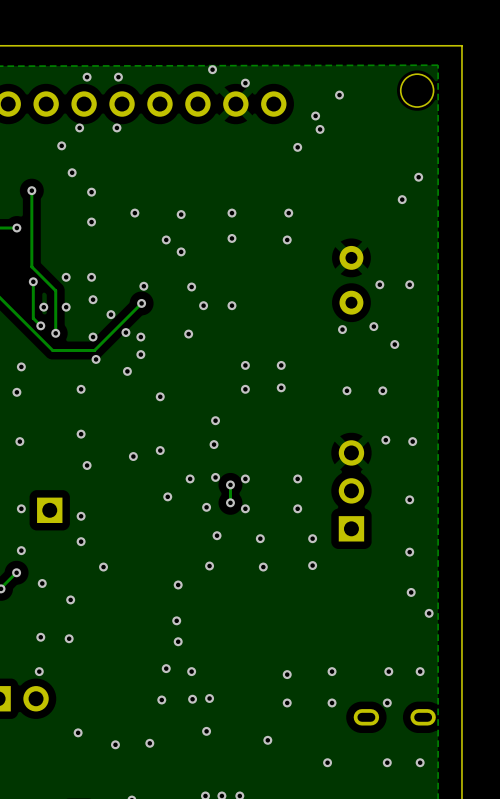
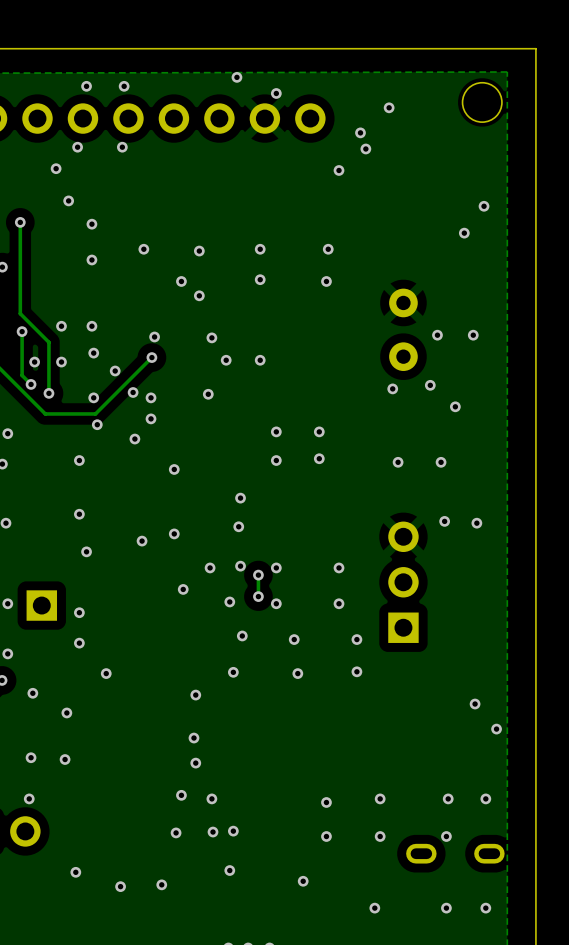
via: (409, 499) -> none
via: (409, 552) -> none

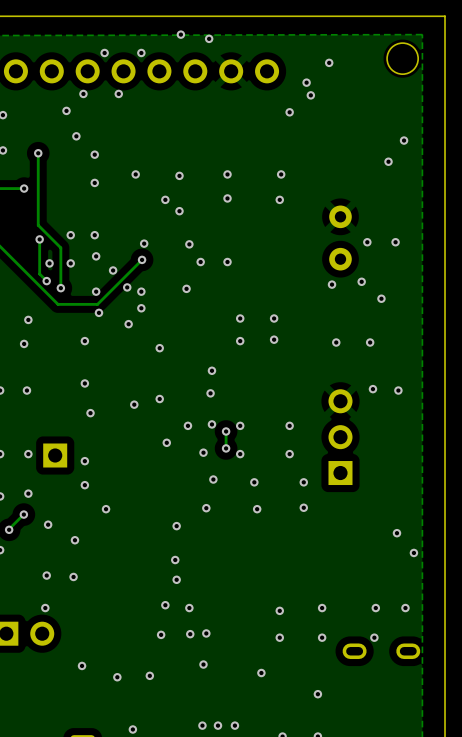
via: none -> (180, 34)
via: (86, 86) -> none
via: (124, 86) -> none
via: (276, 93) -> none
via: none -> (104, 52)
via: none -> (141, 52)
via: (446, 908) -> none
via: (485, 908) -> none

